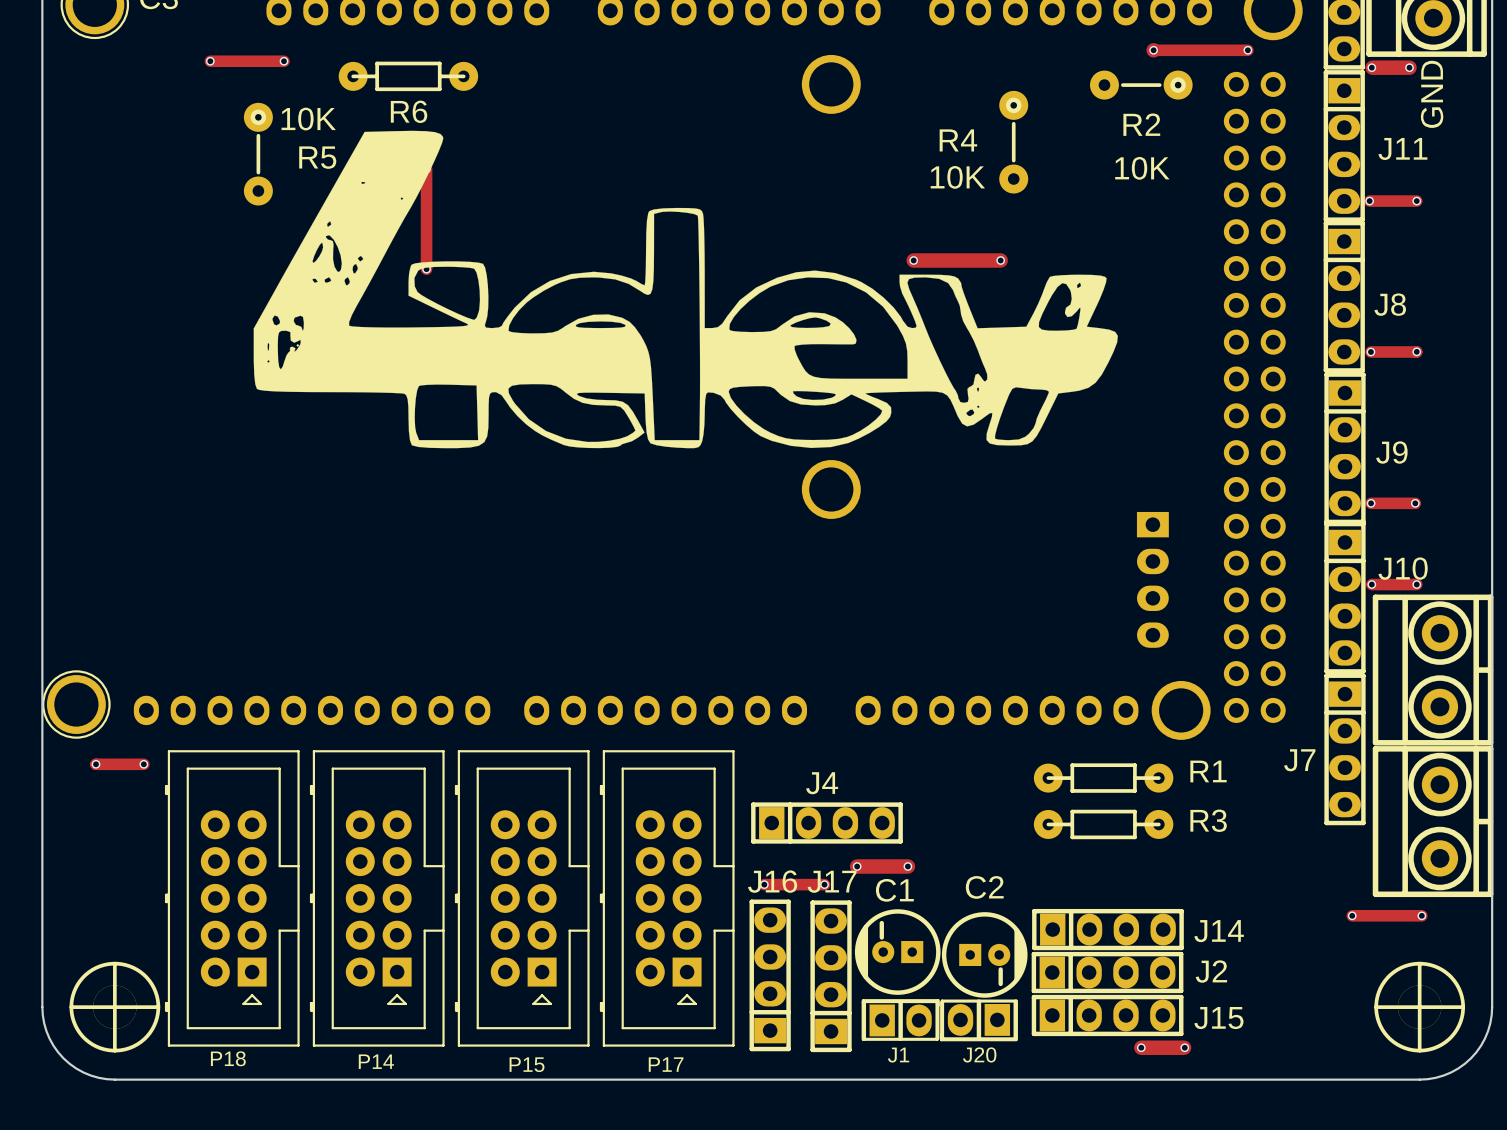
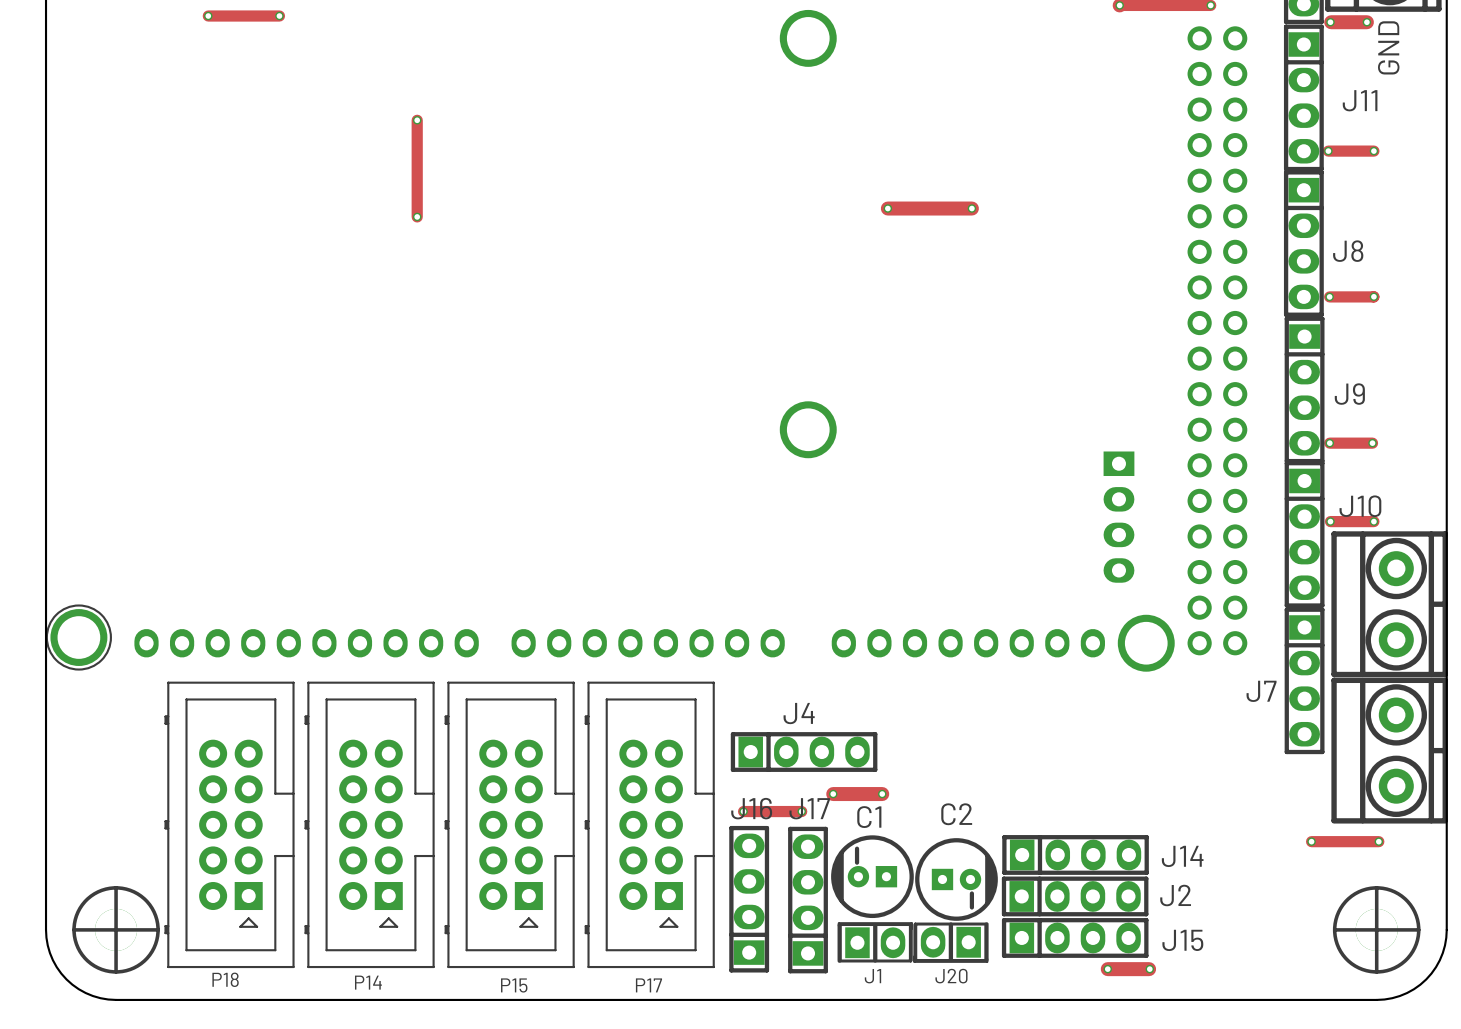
R6: (408, 76) -> none
R2: 10K (1141, 85) -> none
drawing: [253, 130, 1118, 449] -> none
R4: 10K (1013, 142) -> none
R5: 10K (258, 154) -> none
track: (96, 764) (143, 764) -> none
via: (96, 764) -> none
via: (143, 764) -> none
R1: (1103, 778) -> none
R3: (1103, 824) -> none

